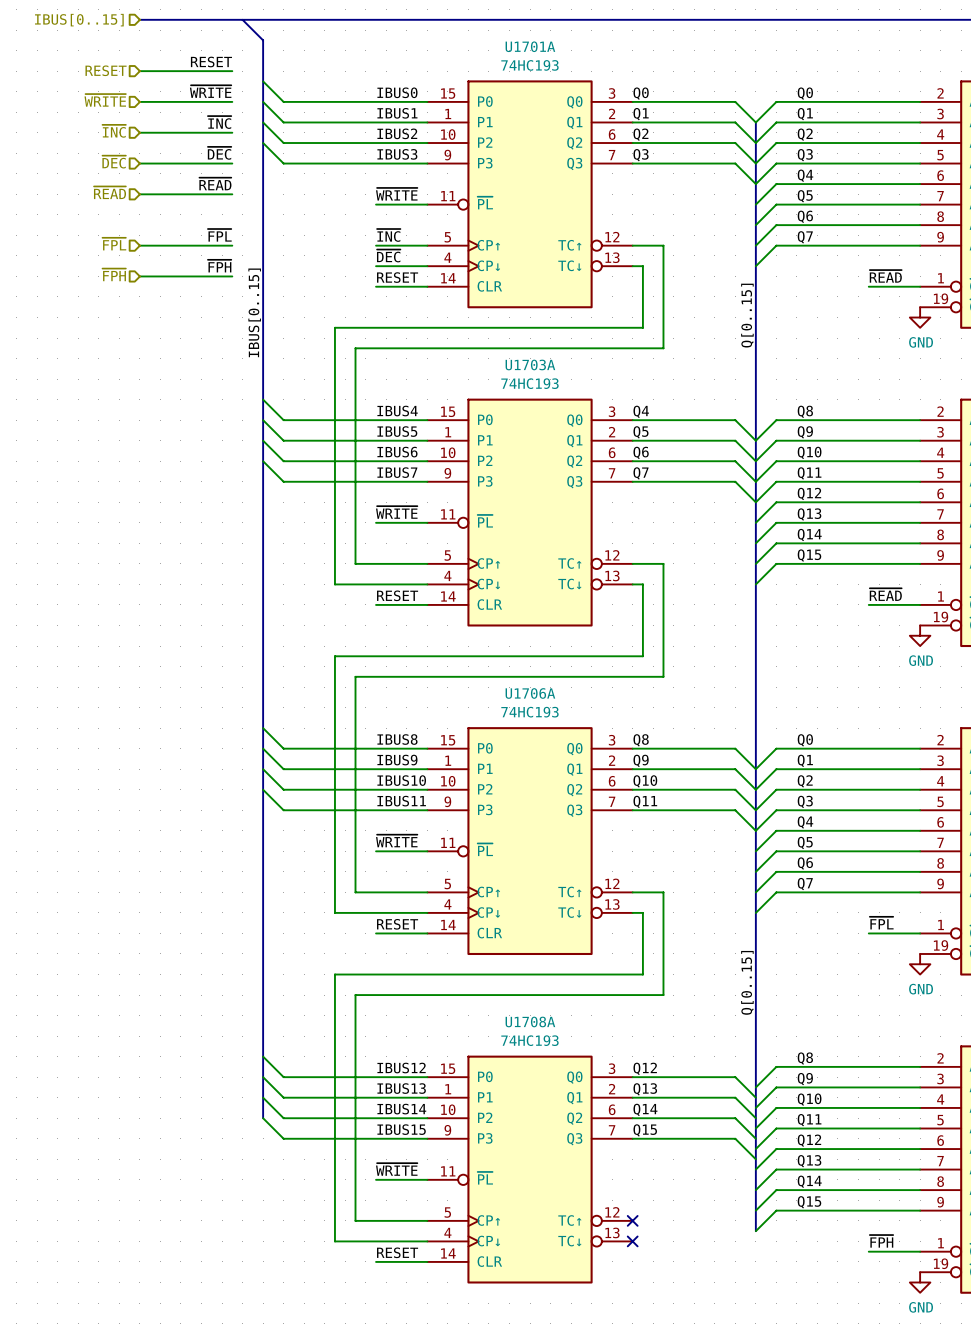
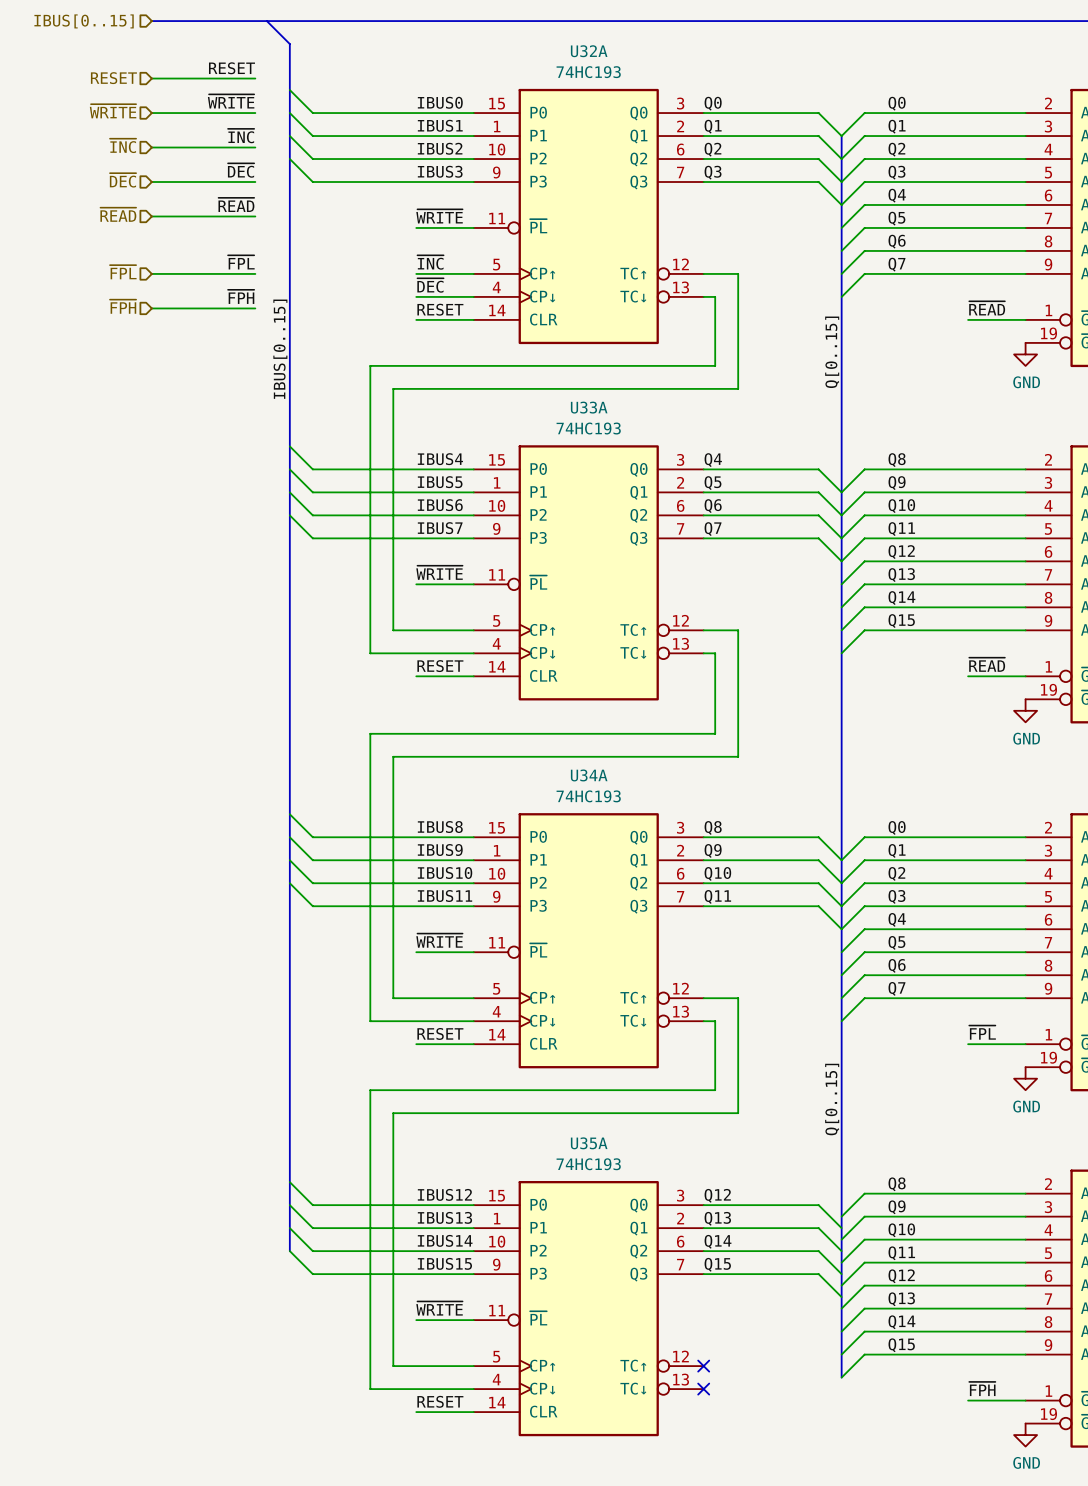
U1701A name: U1701A (530, 46) -> U32A (589, 51)
U1703A name: U1703A (530, 364) -> U33A (589, 407)
U1706A name: U1706A (530, 693) -> U34A (589, 775)
U1708A name: U1708A (530, 1021) -> U35A (589, 1143)

